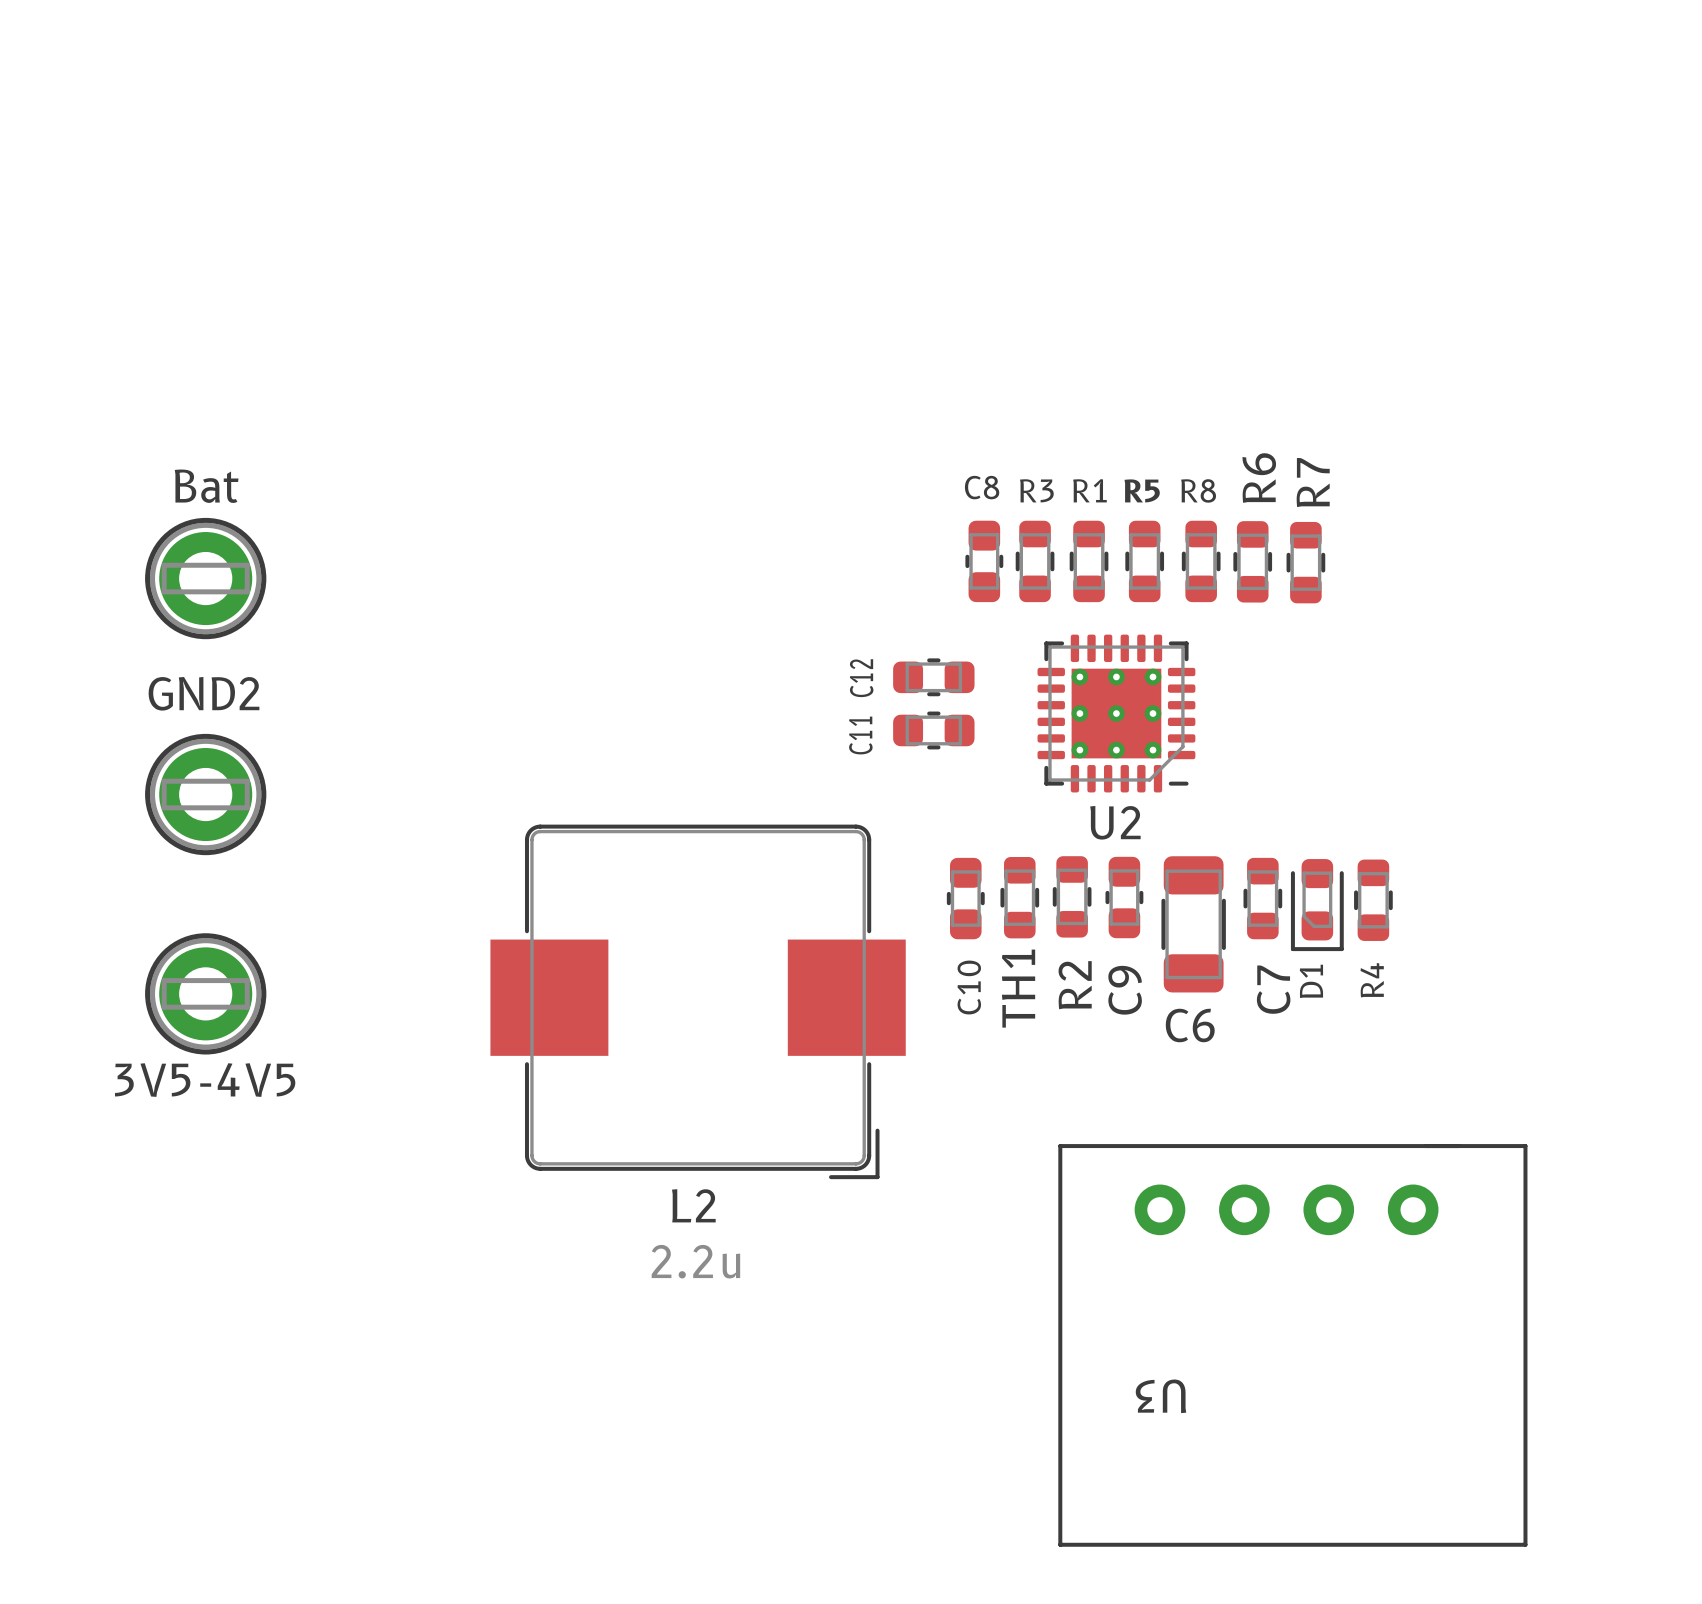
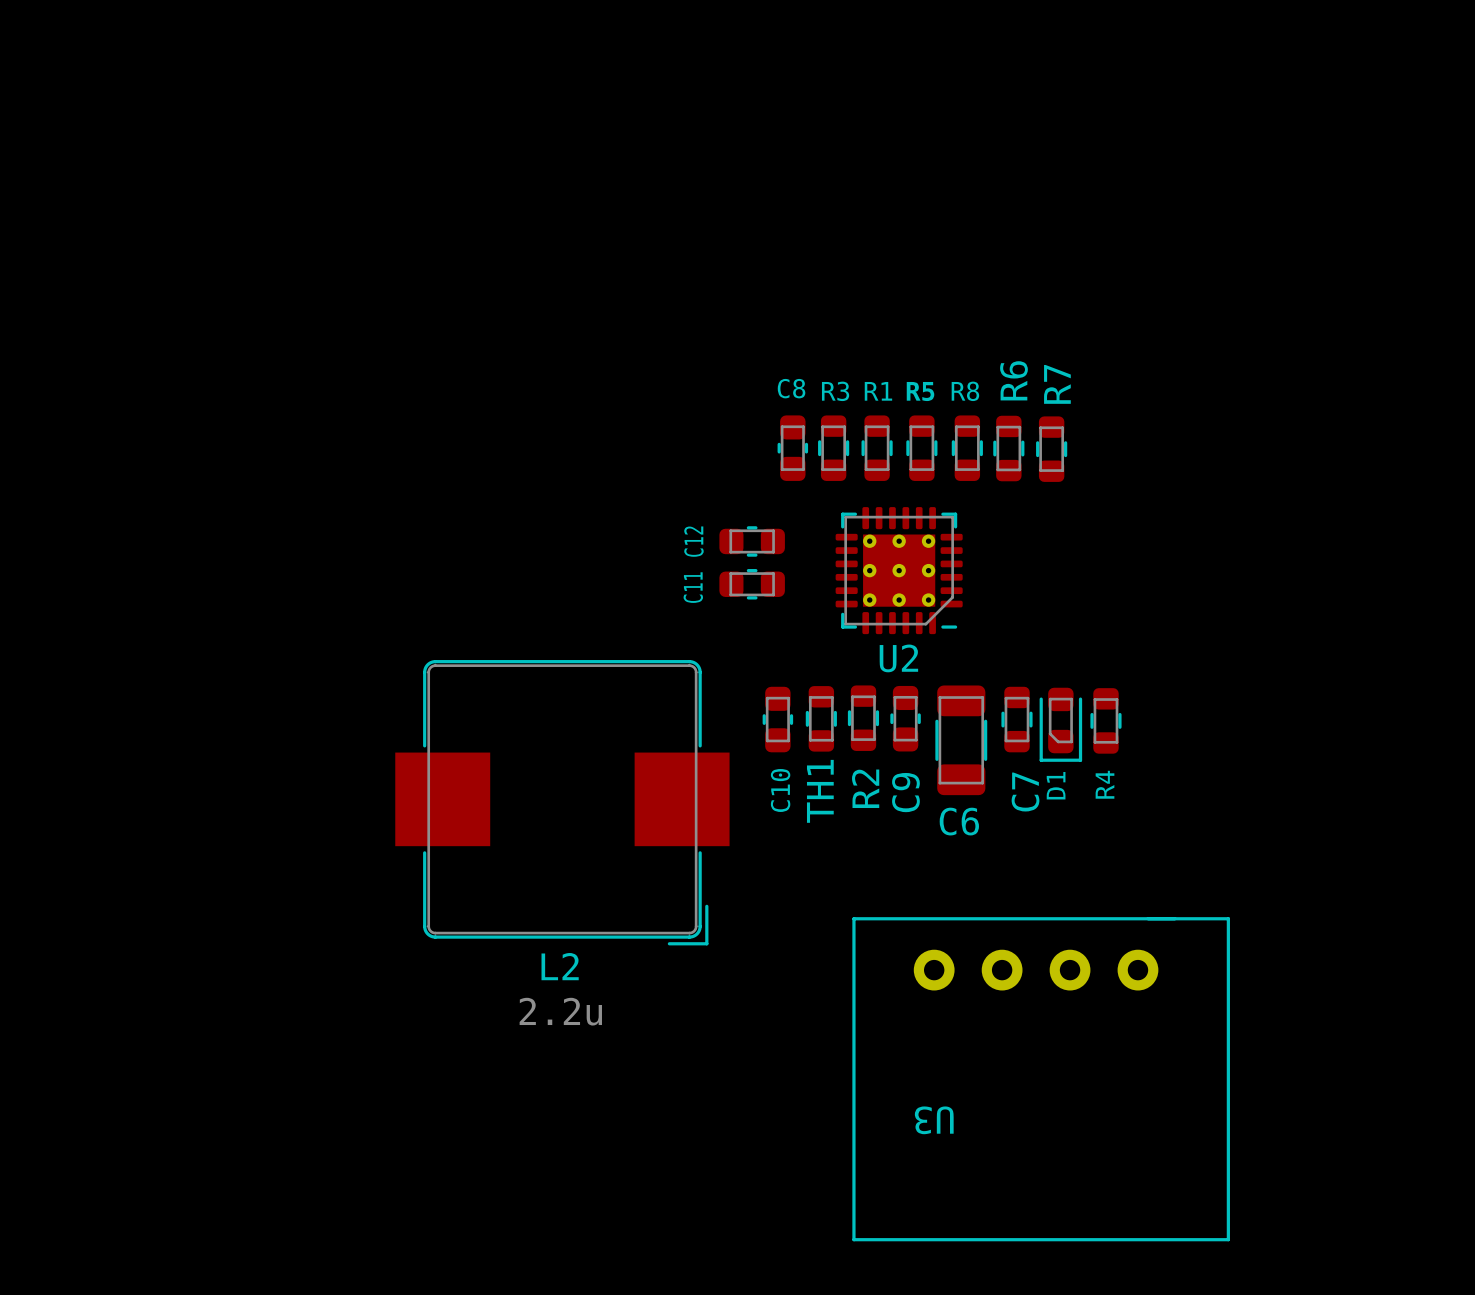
Bat: (205, 578) -> none
GND2: (205, 794) -> none
3V5-4V5: (205, 993) -> none

